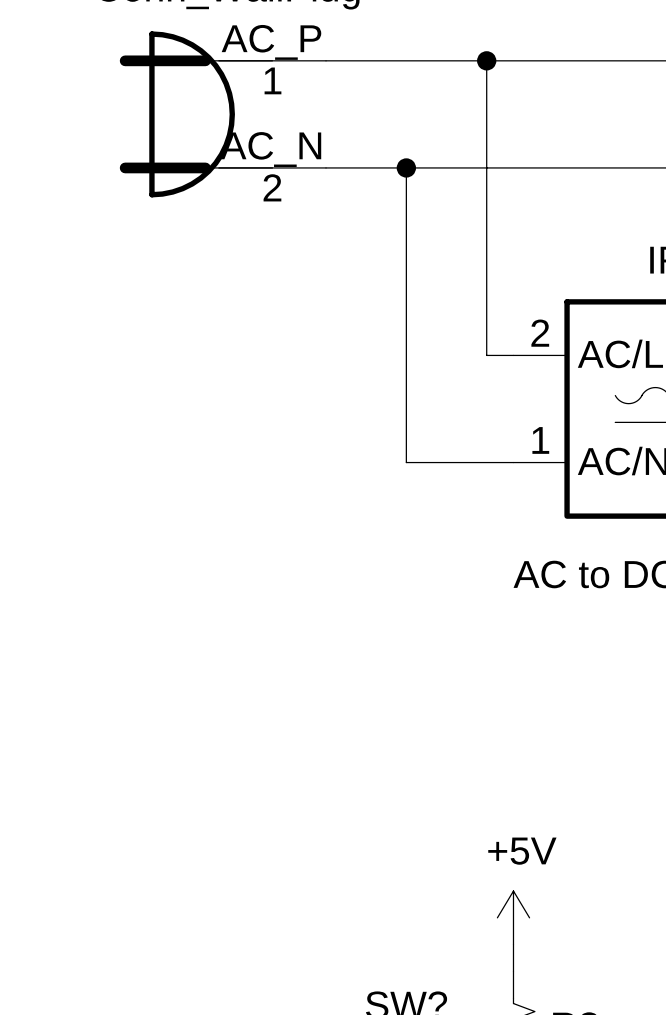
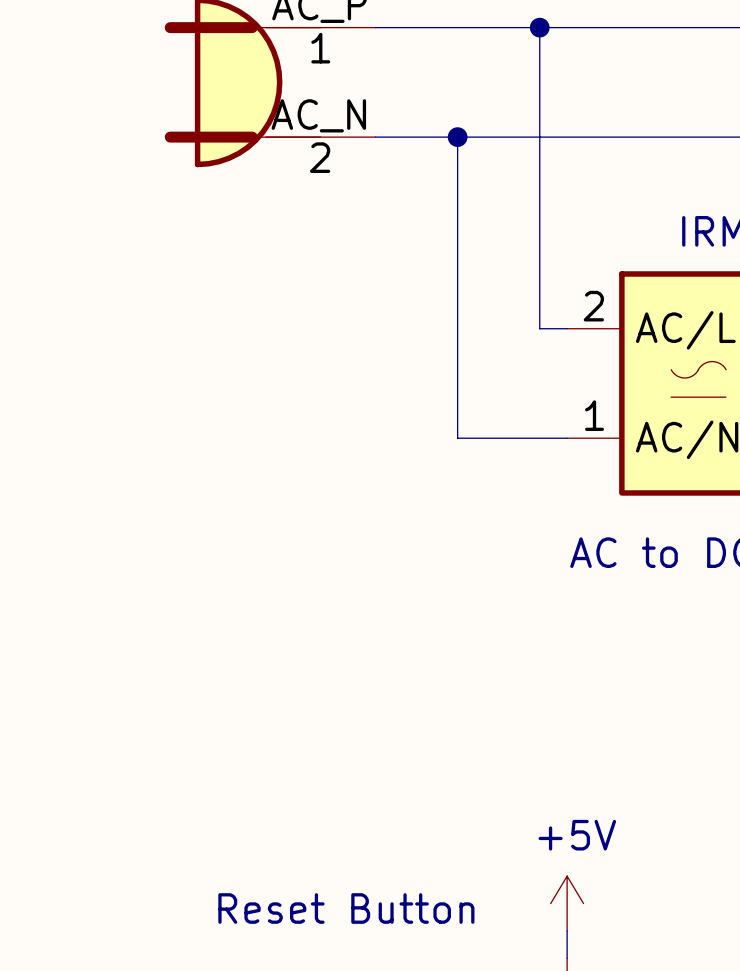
text: none -> Reset Button (346, 908)

